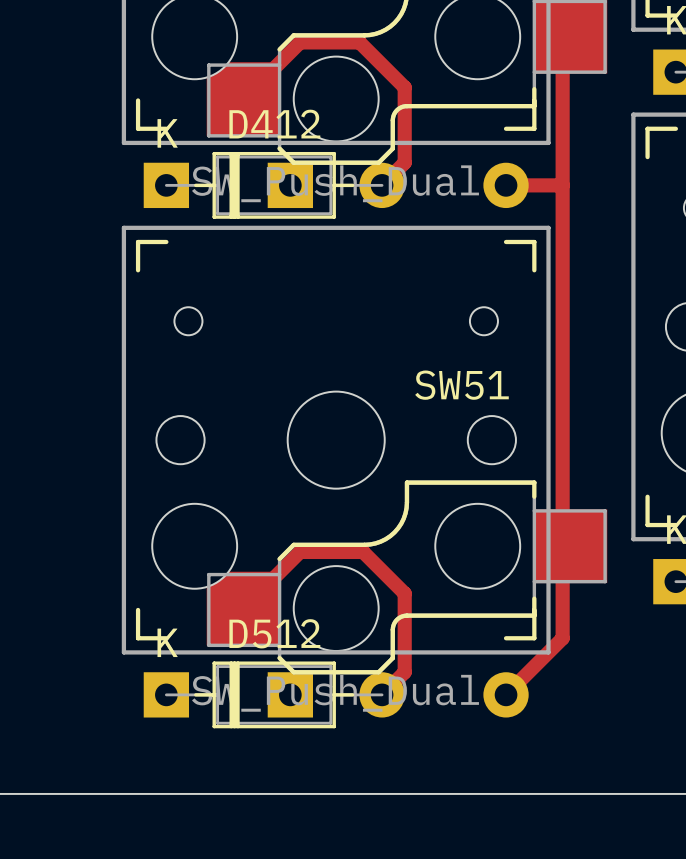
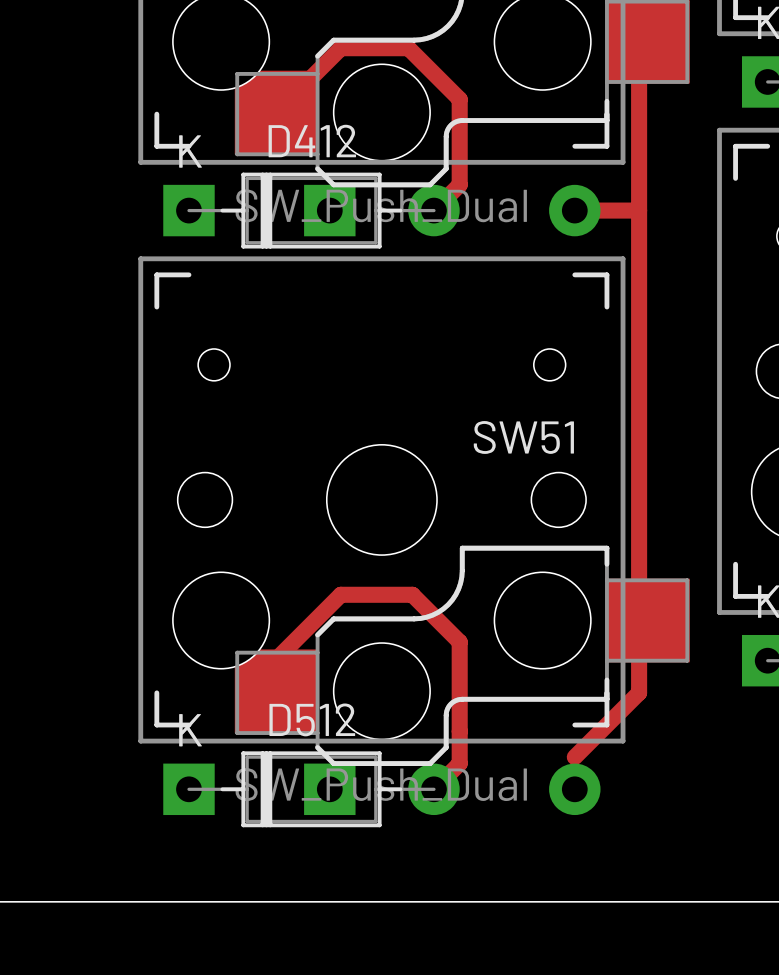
track: (404, 593) (363, 551) (300, 551) (243, 608) -> (459, 674) (459, 642) (412, 594) (340, 594) (276, 659)
track: (562, 609) (562, 638) (506, 694) -> (639, 692) (574, 757)

